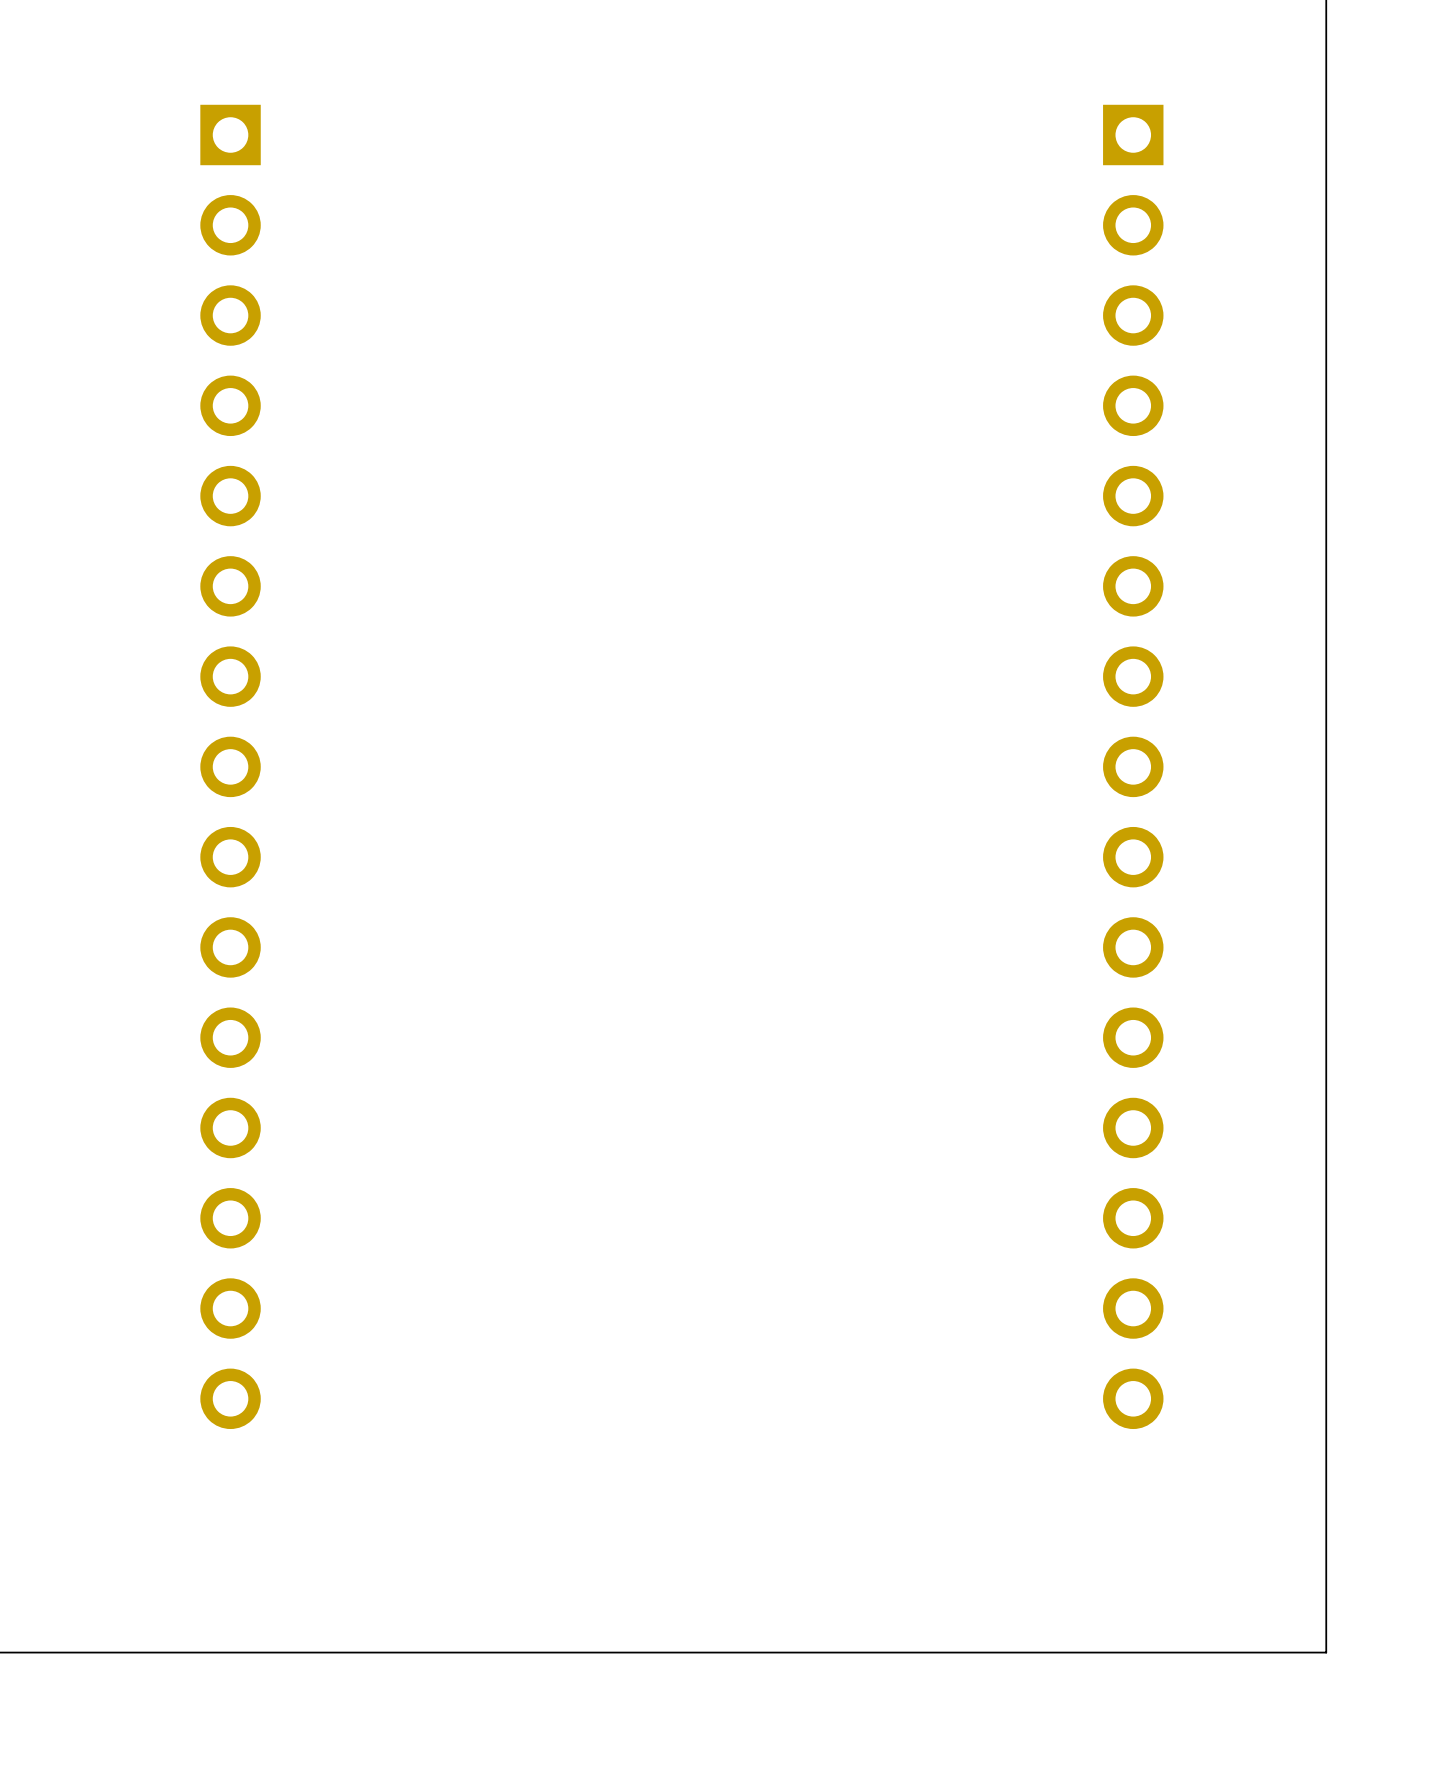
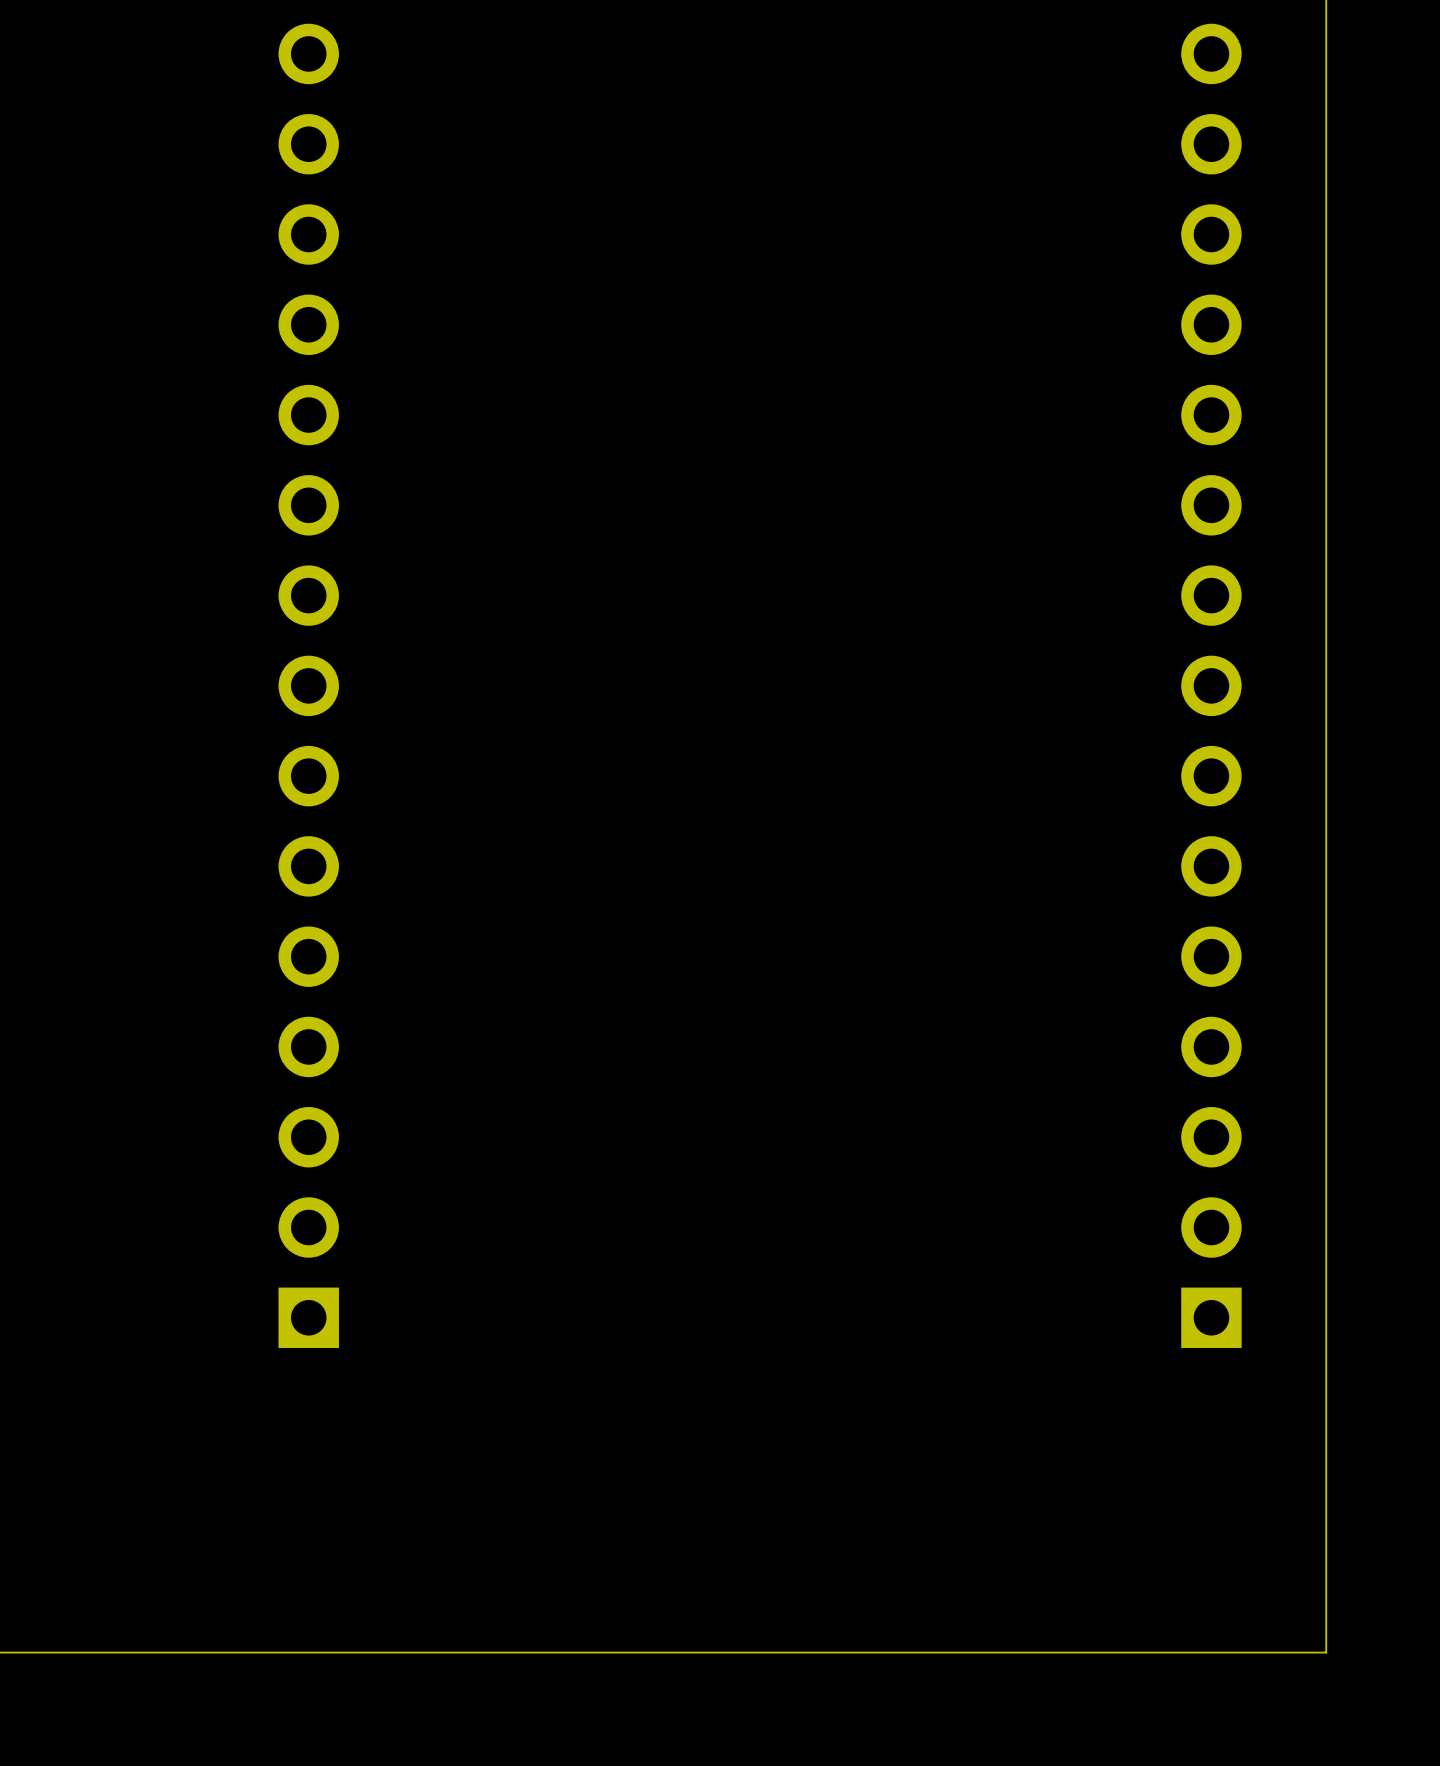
part rotation: 0° (230, 766) -> 180° (308, 685)
part rotation: 0° (1133, 766) -> 180° (1211, 685)

